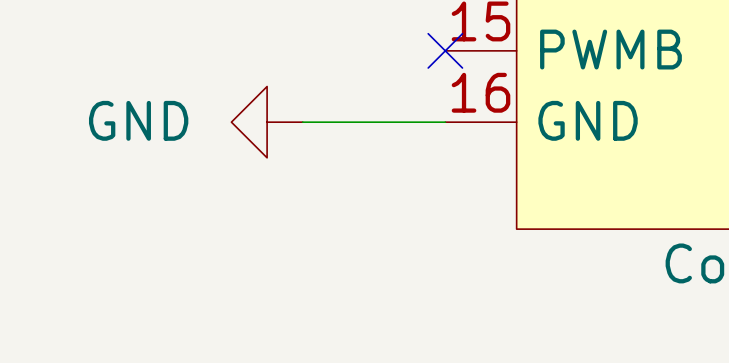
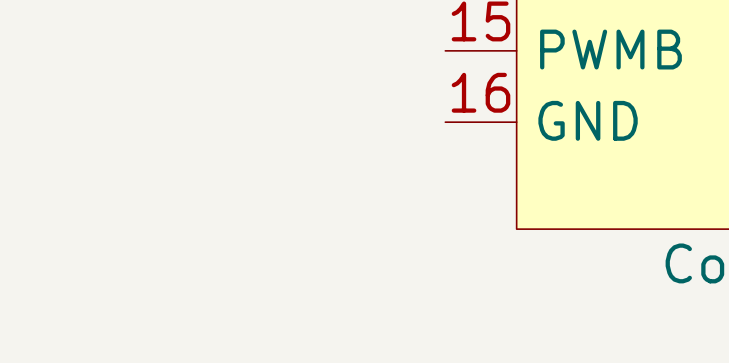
no-connect mark: (445, 50) -> none
power symbol: GND (267, 122) -> none
wire: (302, 122) (445, 122) -> none

